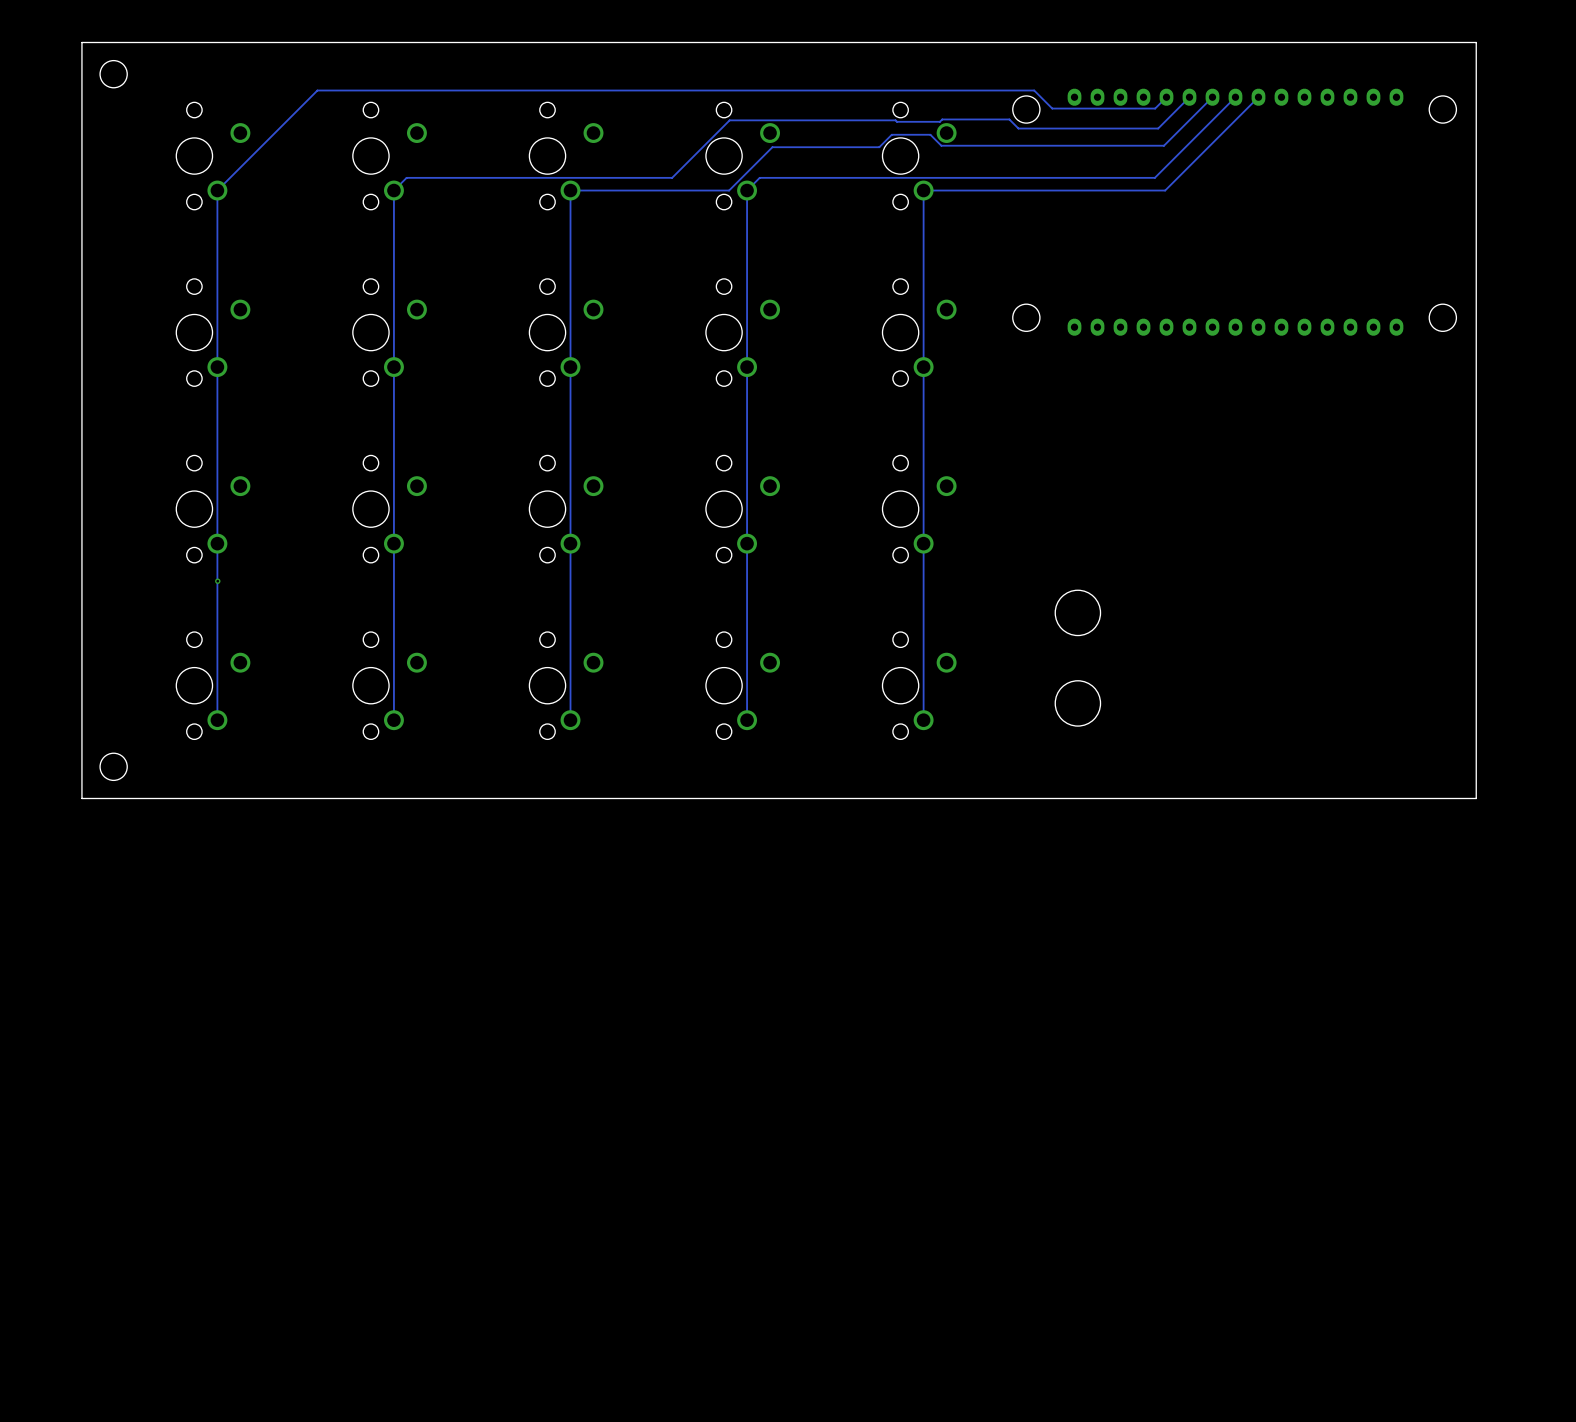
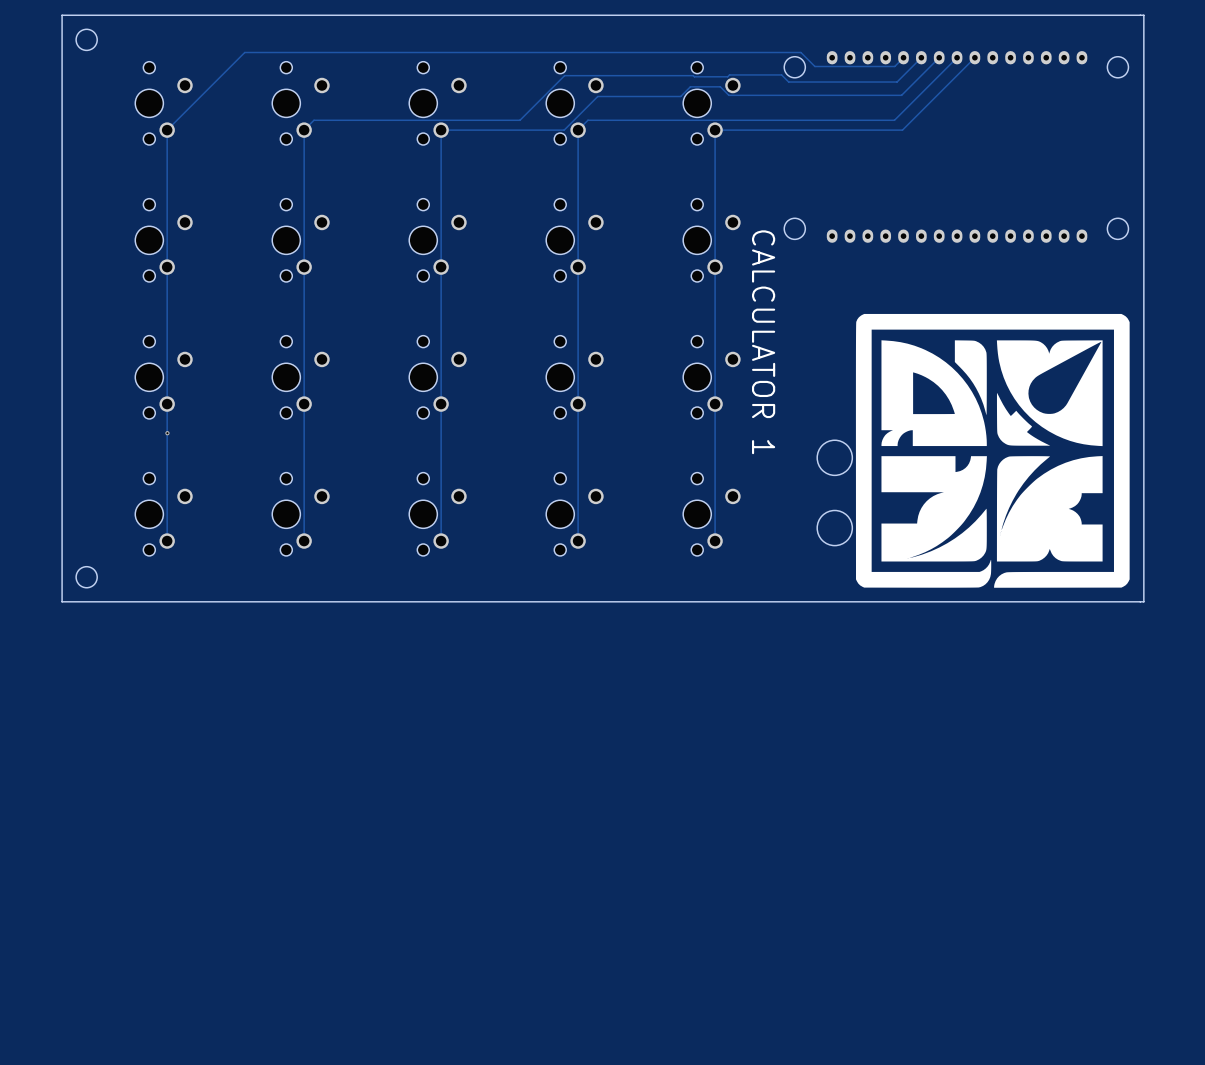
drawing: none -> [855, 313, 1130, 588]
text: none -> CALCULATOR 1 (763, 342)

